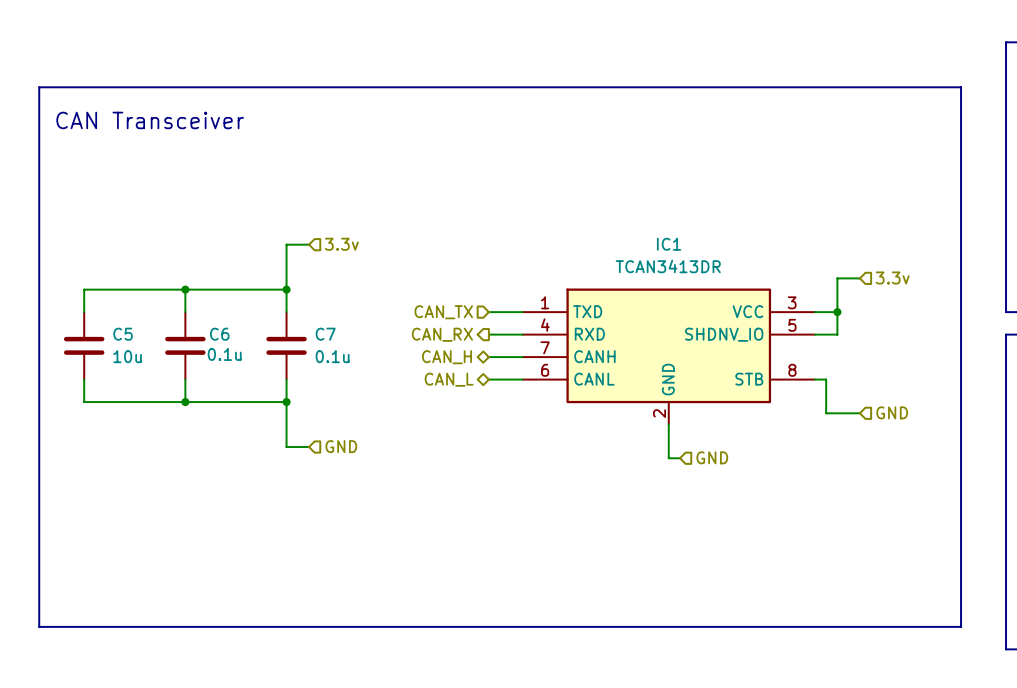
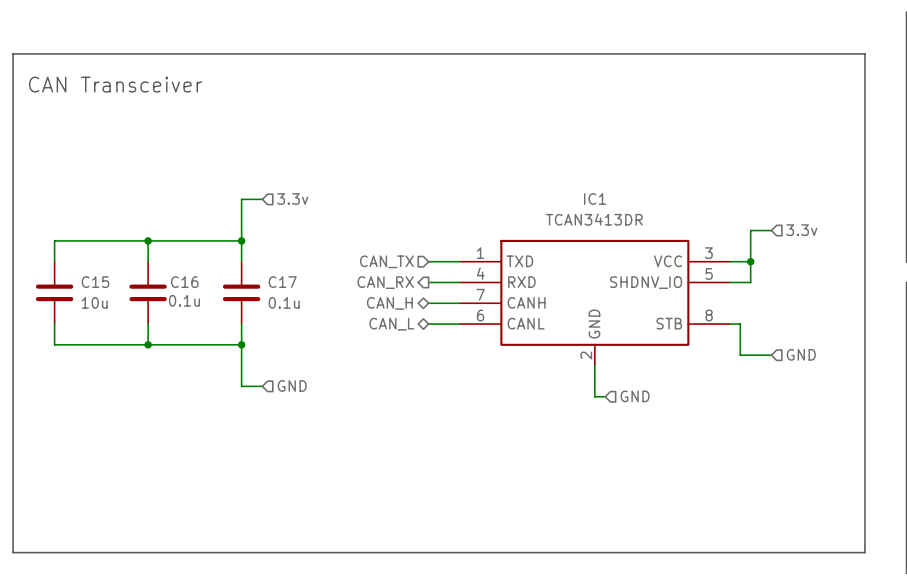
C5 name: C5 (123, 334) -> C15 (95, 282)
C6 name: C6 (219, 334) -> C16 (184, 282)
C7 name: C7 (325, 334) -> C17 (282, 282)

